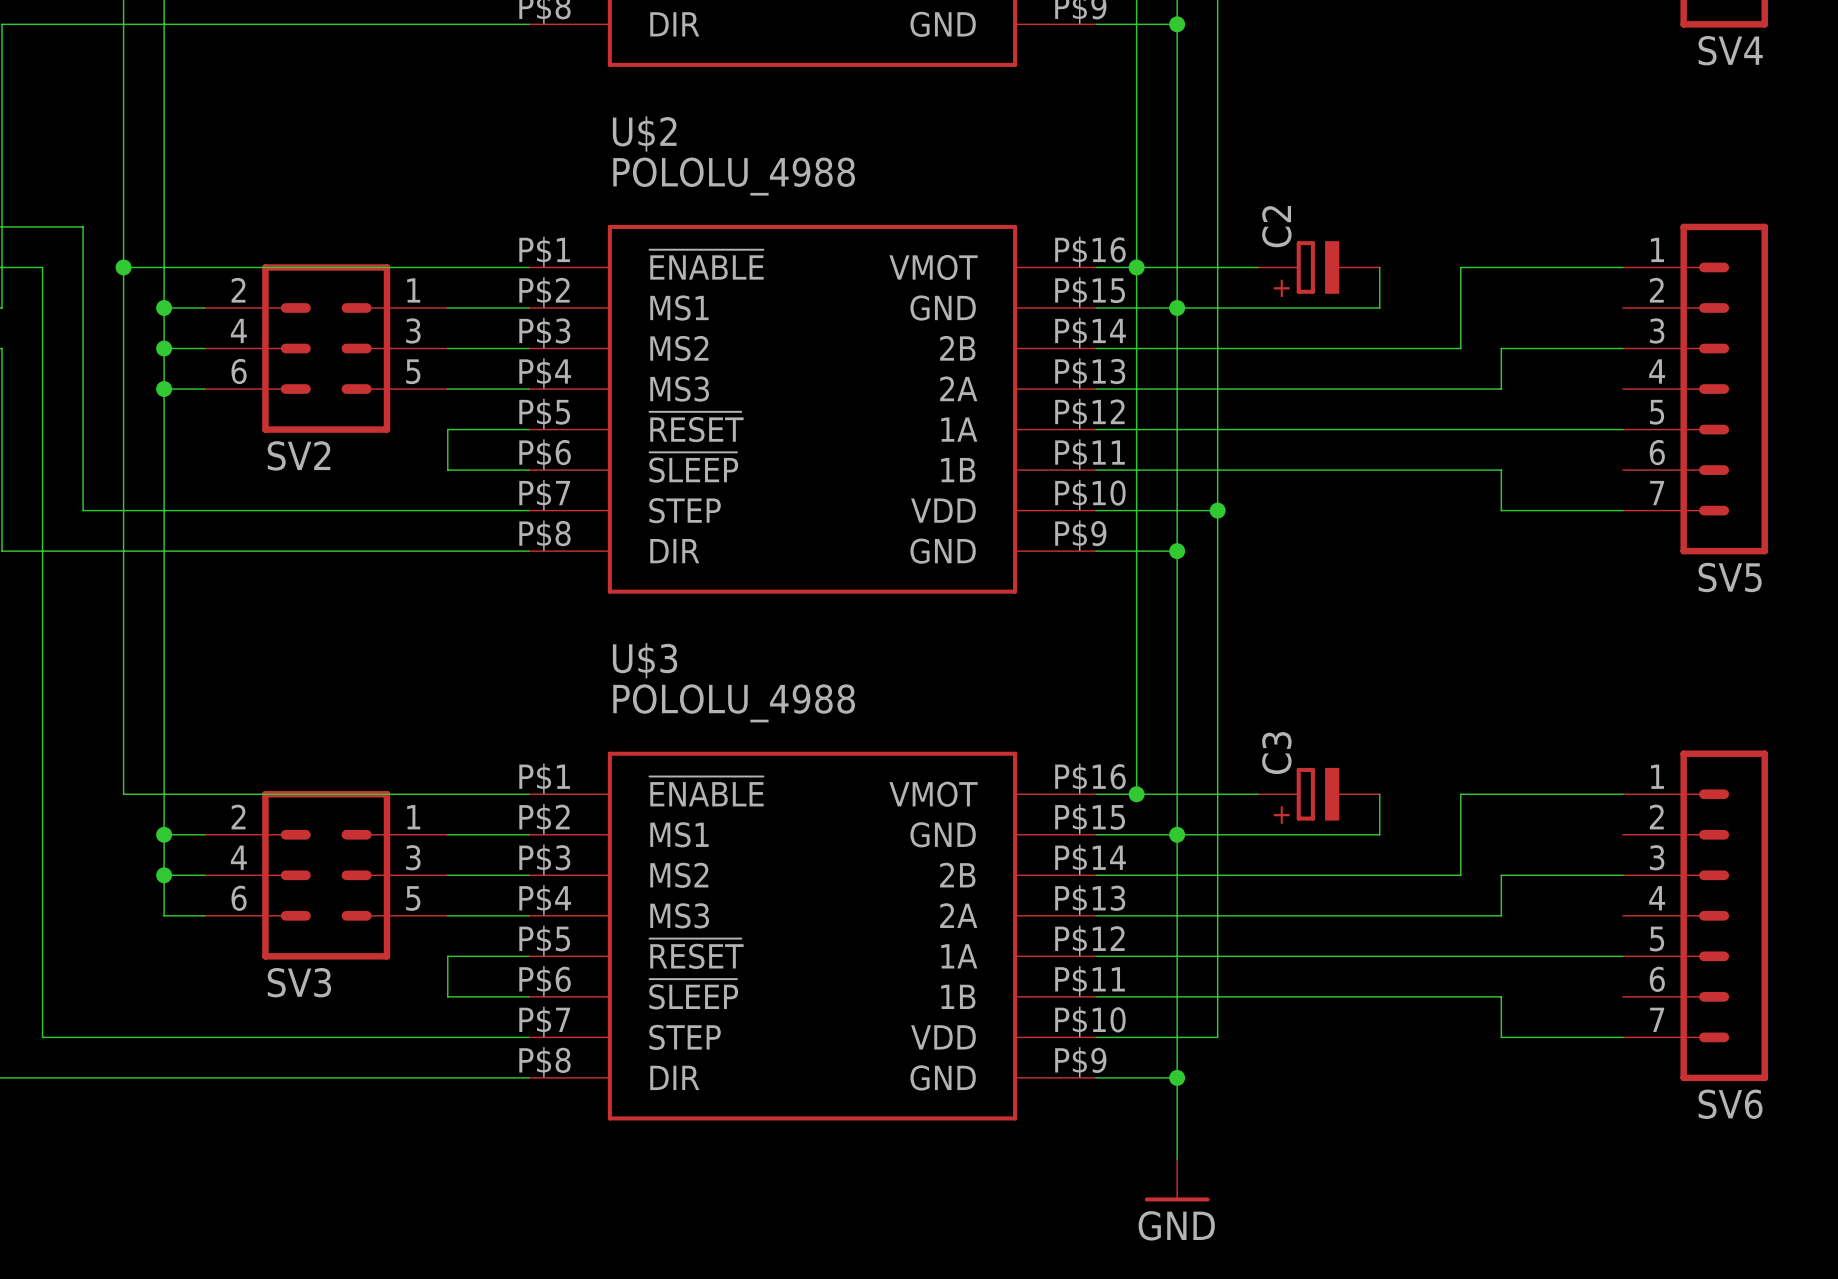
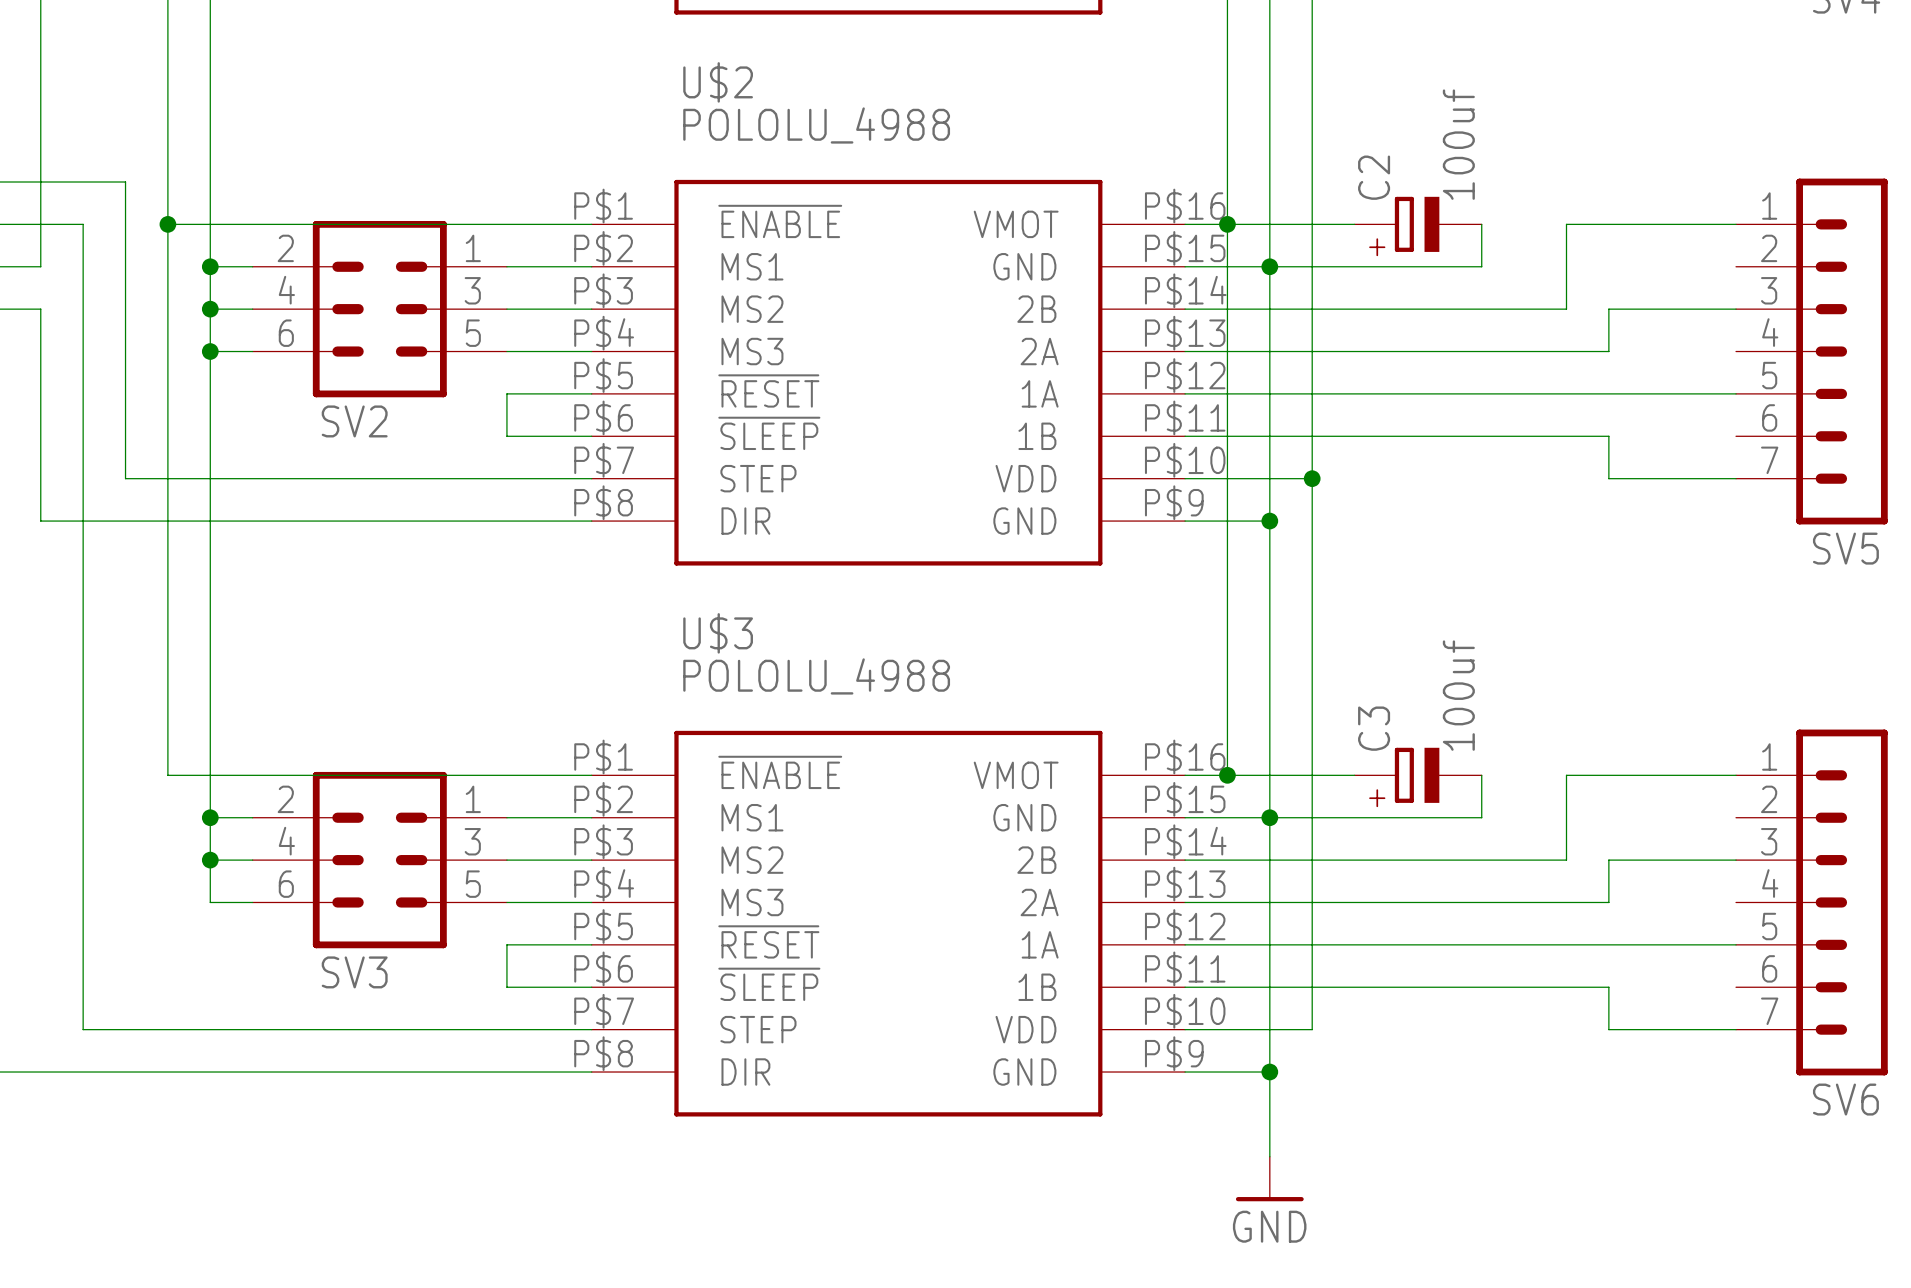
C2 value: none -> 100uf (1458, 144)
C3 value: none -> 100uf (1458, 695)

